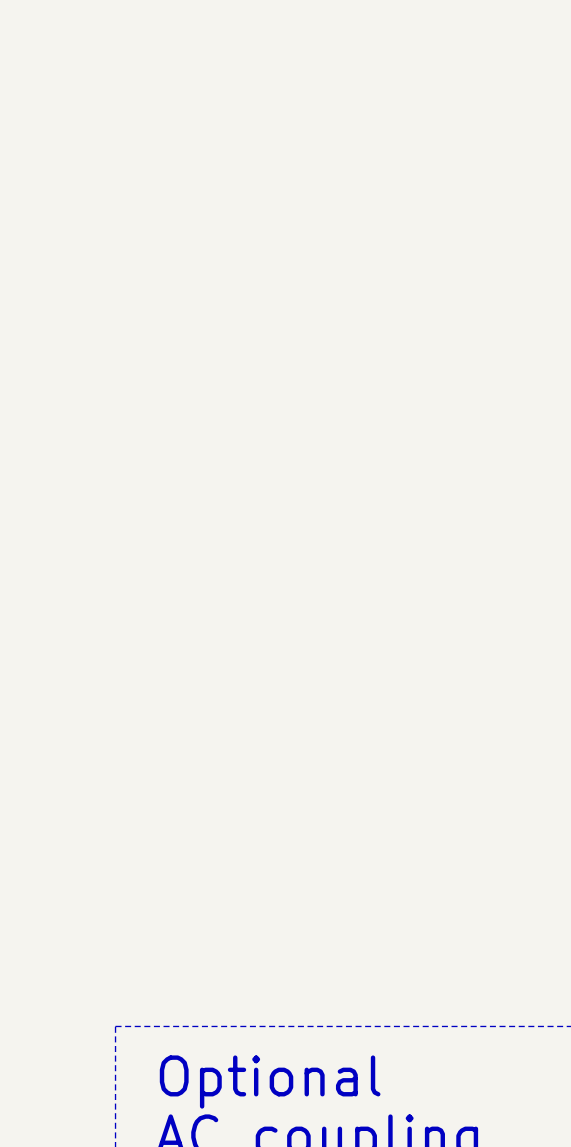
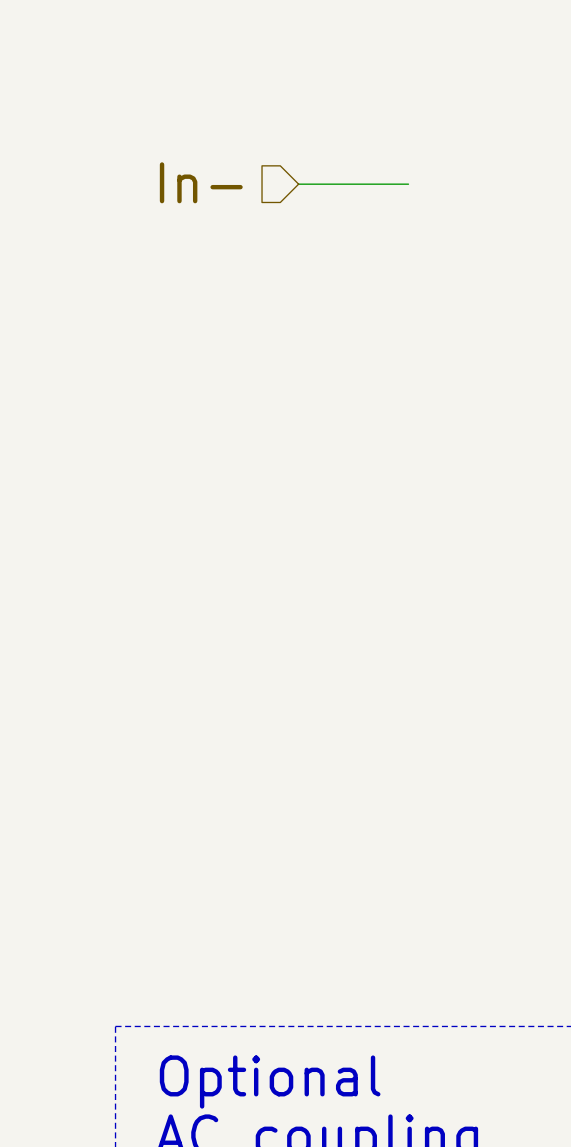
hierarchical label: none -> In- (201, 182)
wire: none -> (298, 184) (408, 184)

